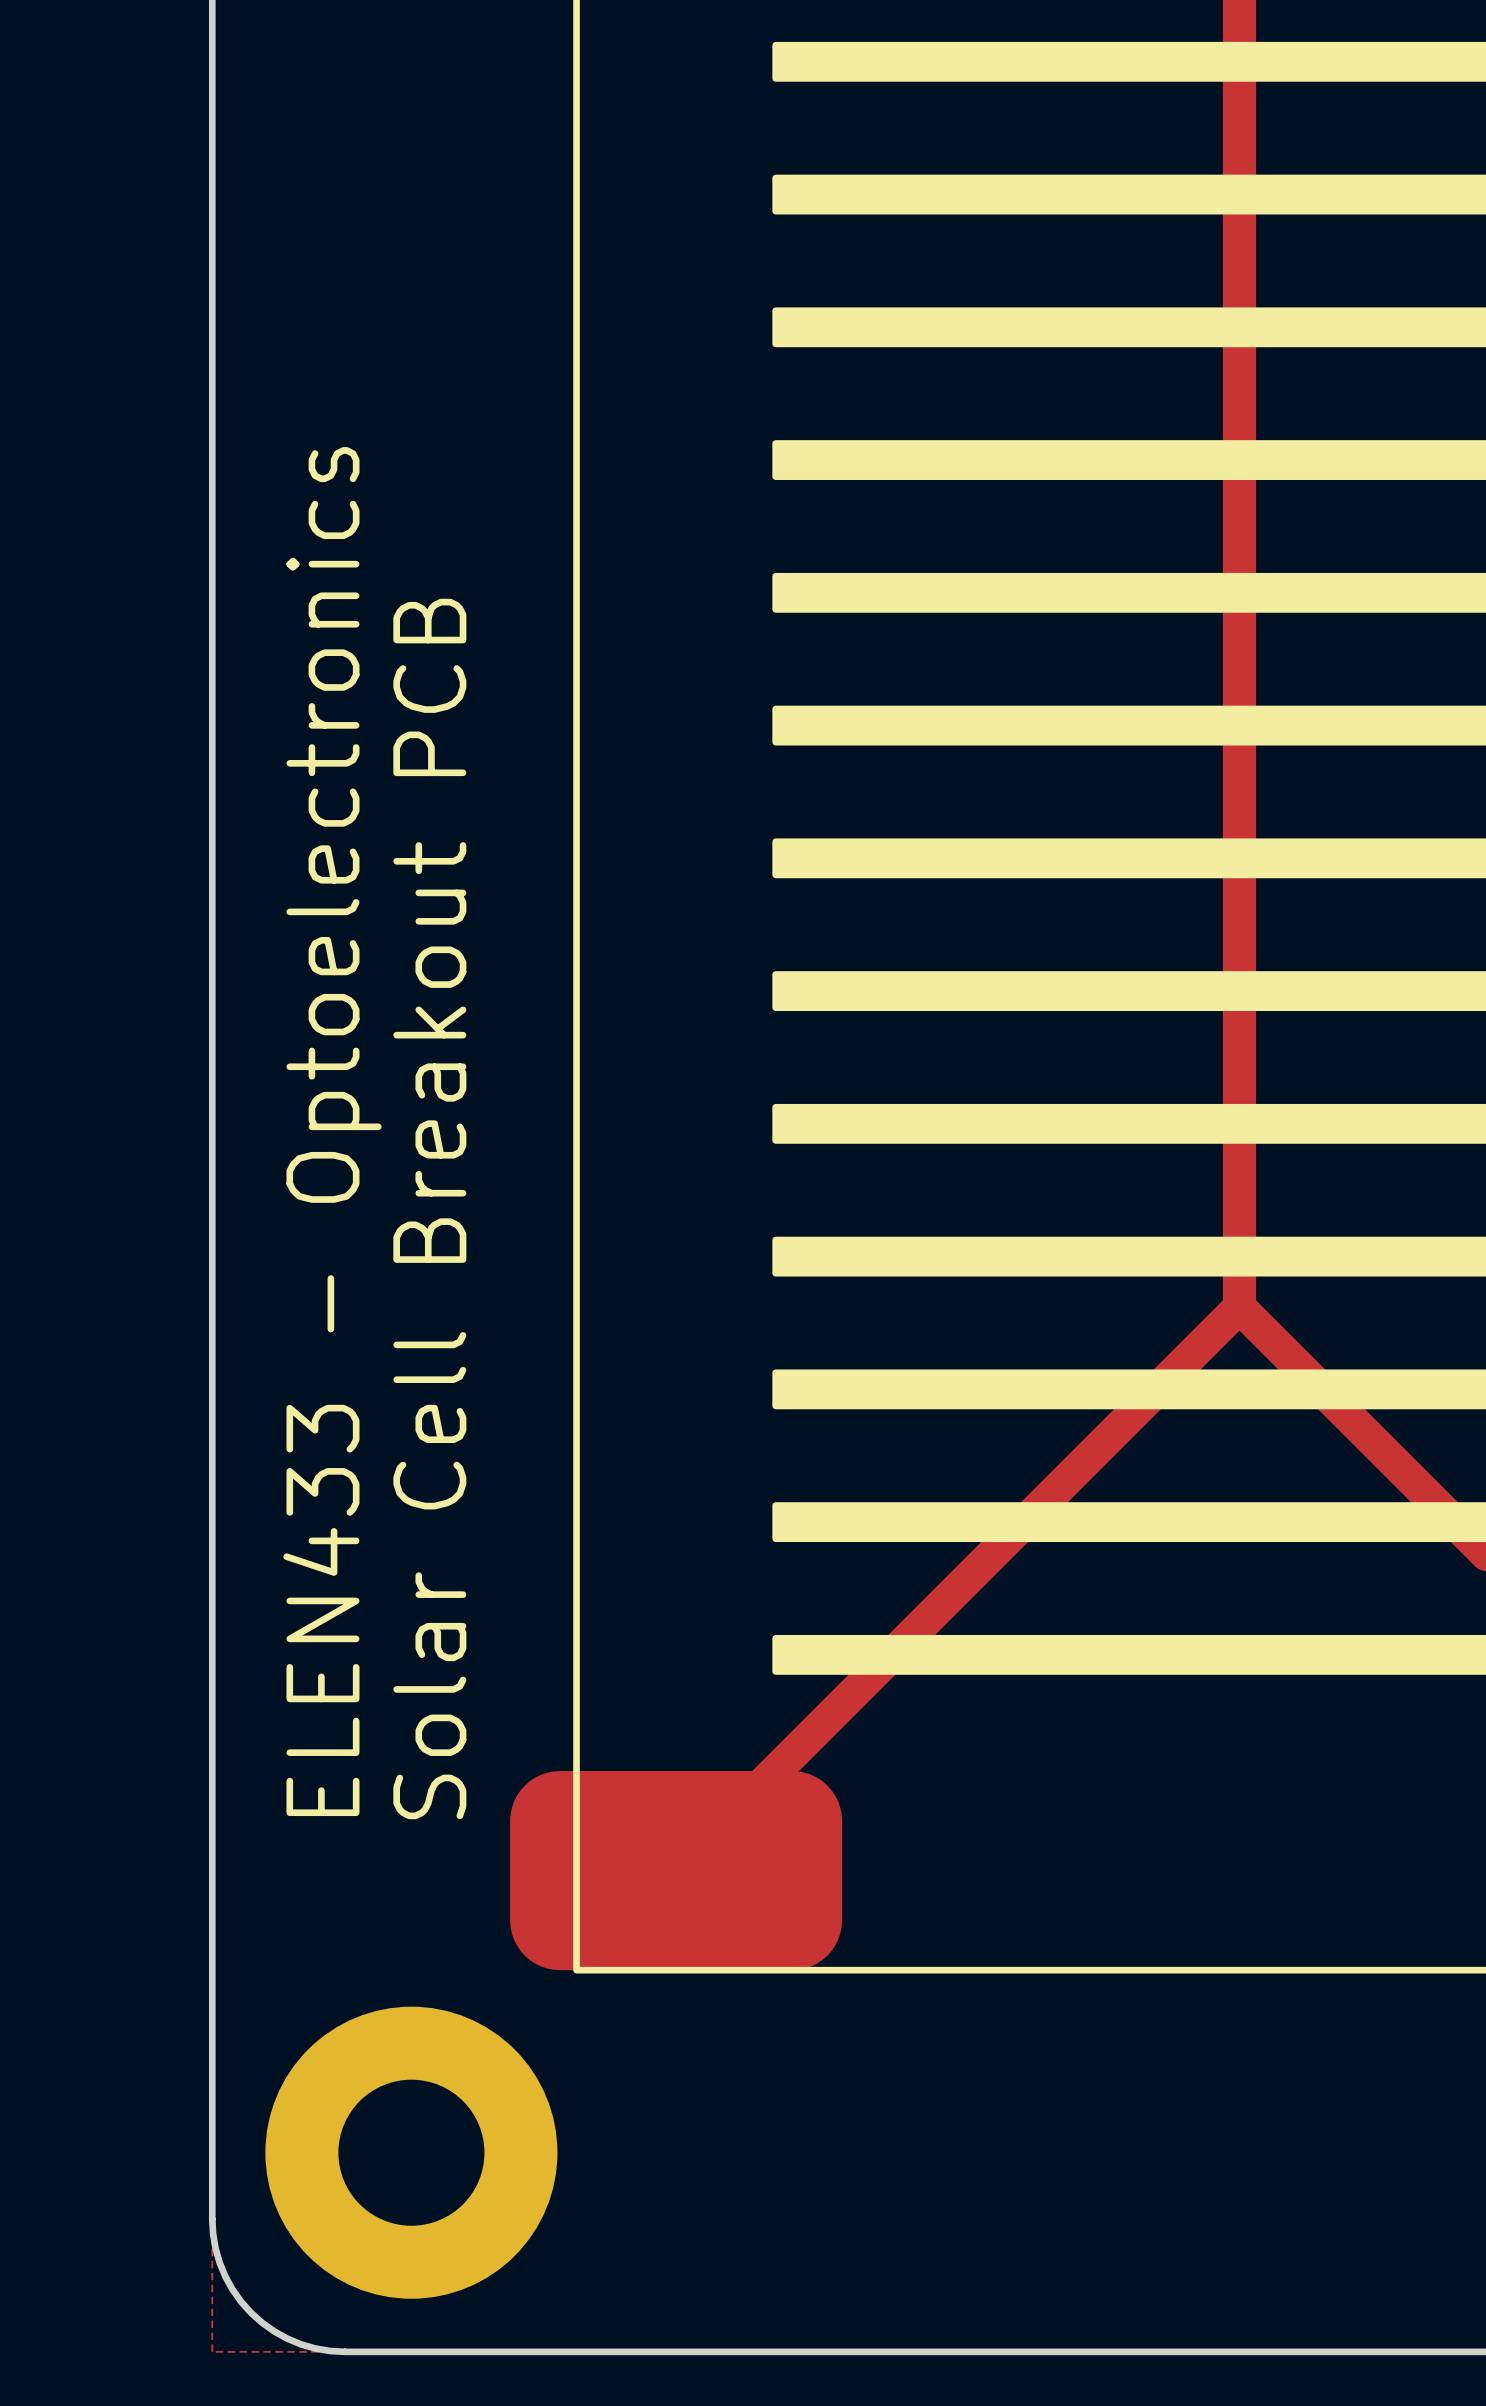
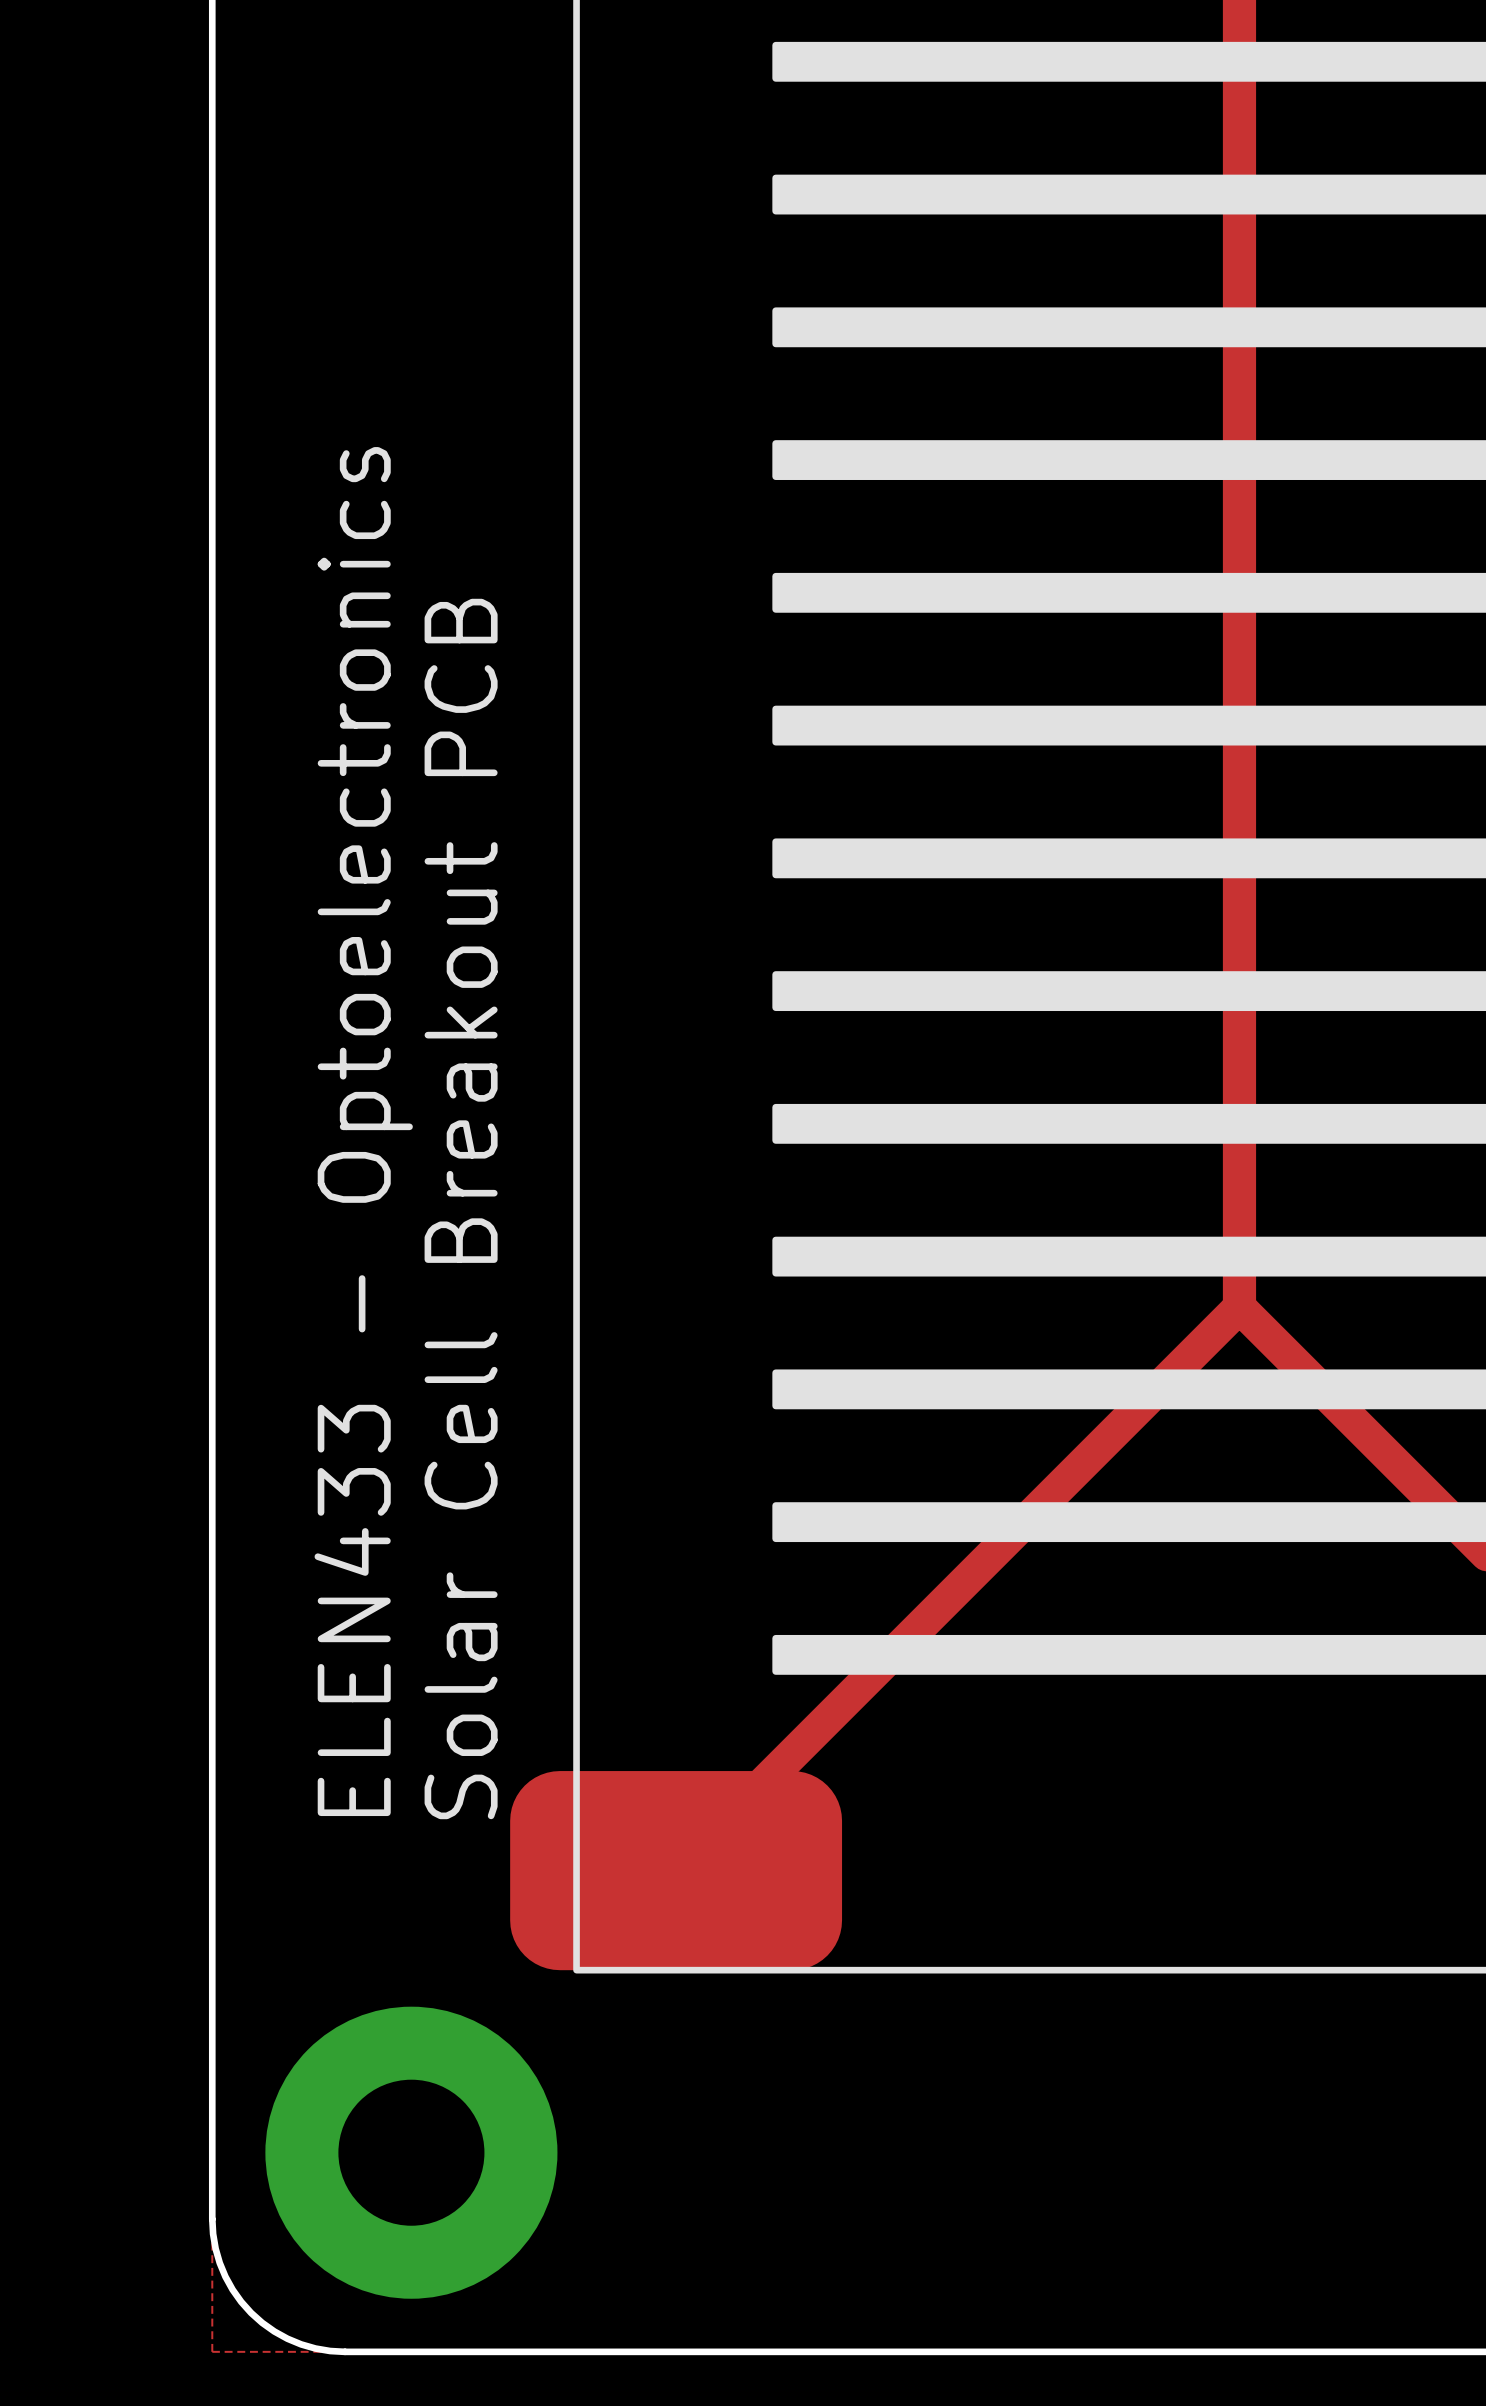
text position: ELEN433 - Optoelectronics (332, 1131) -> ELEN433 - Optoelectronics (363, 1131)
text position: Solar Cell Breakout PCB (429, 1208) -> Solar Cell Breakout PCB (461, 1208)

